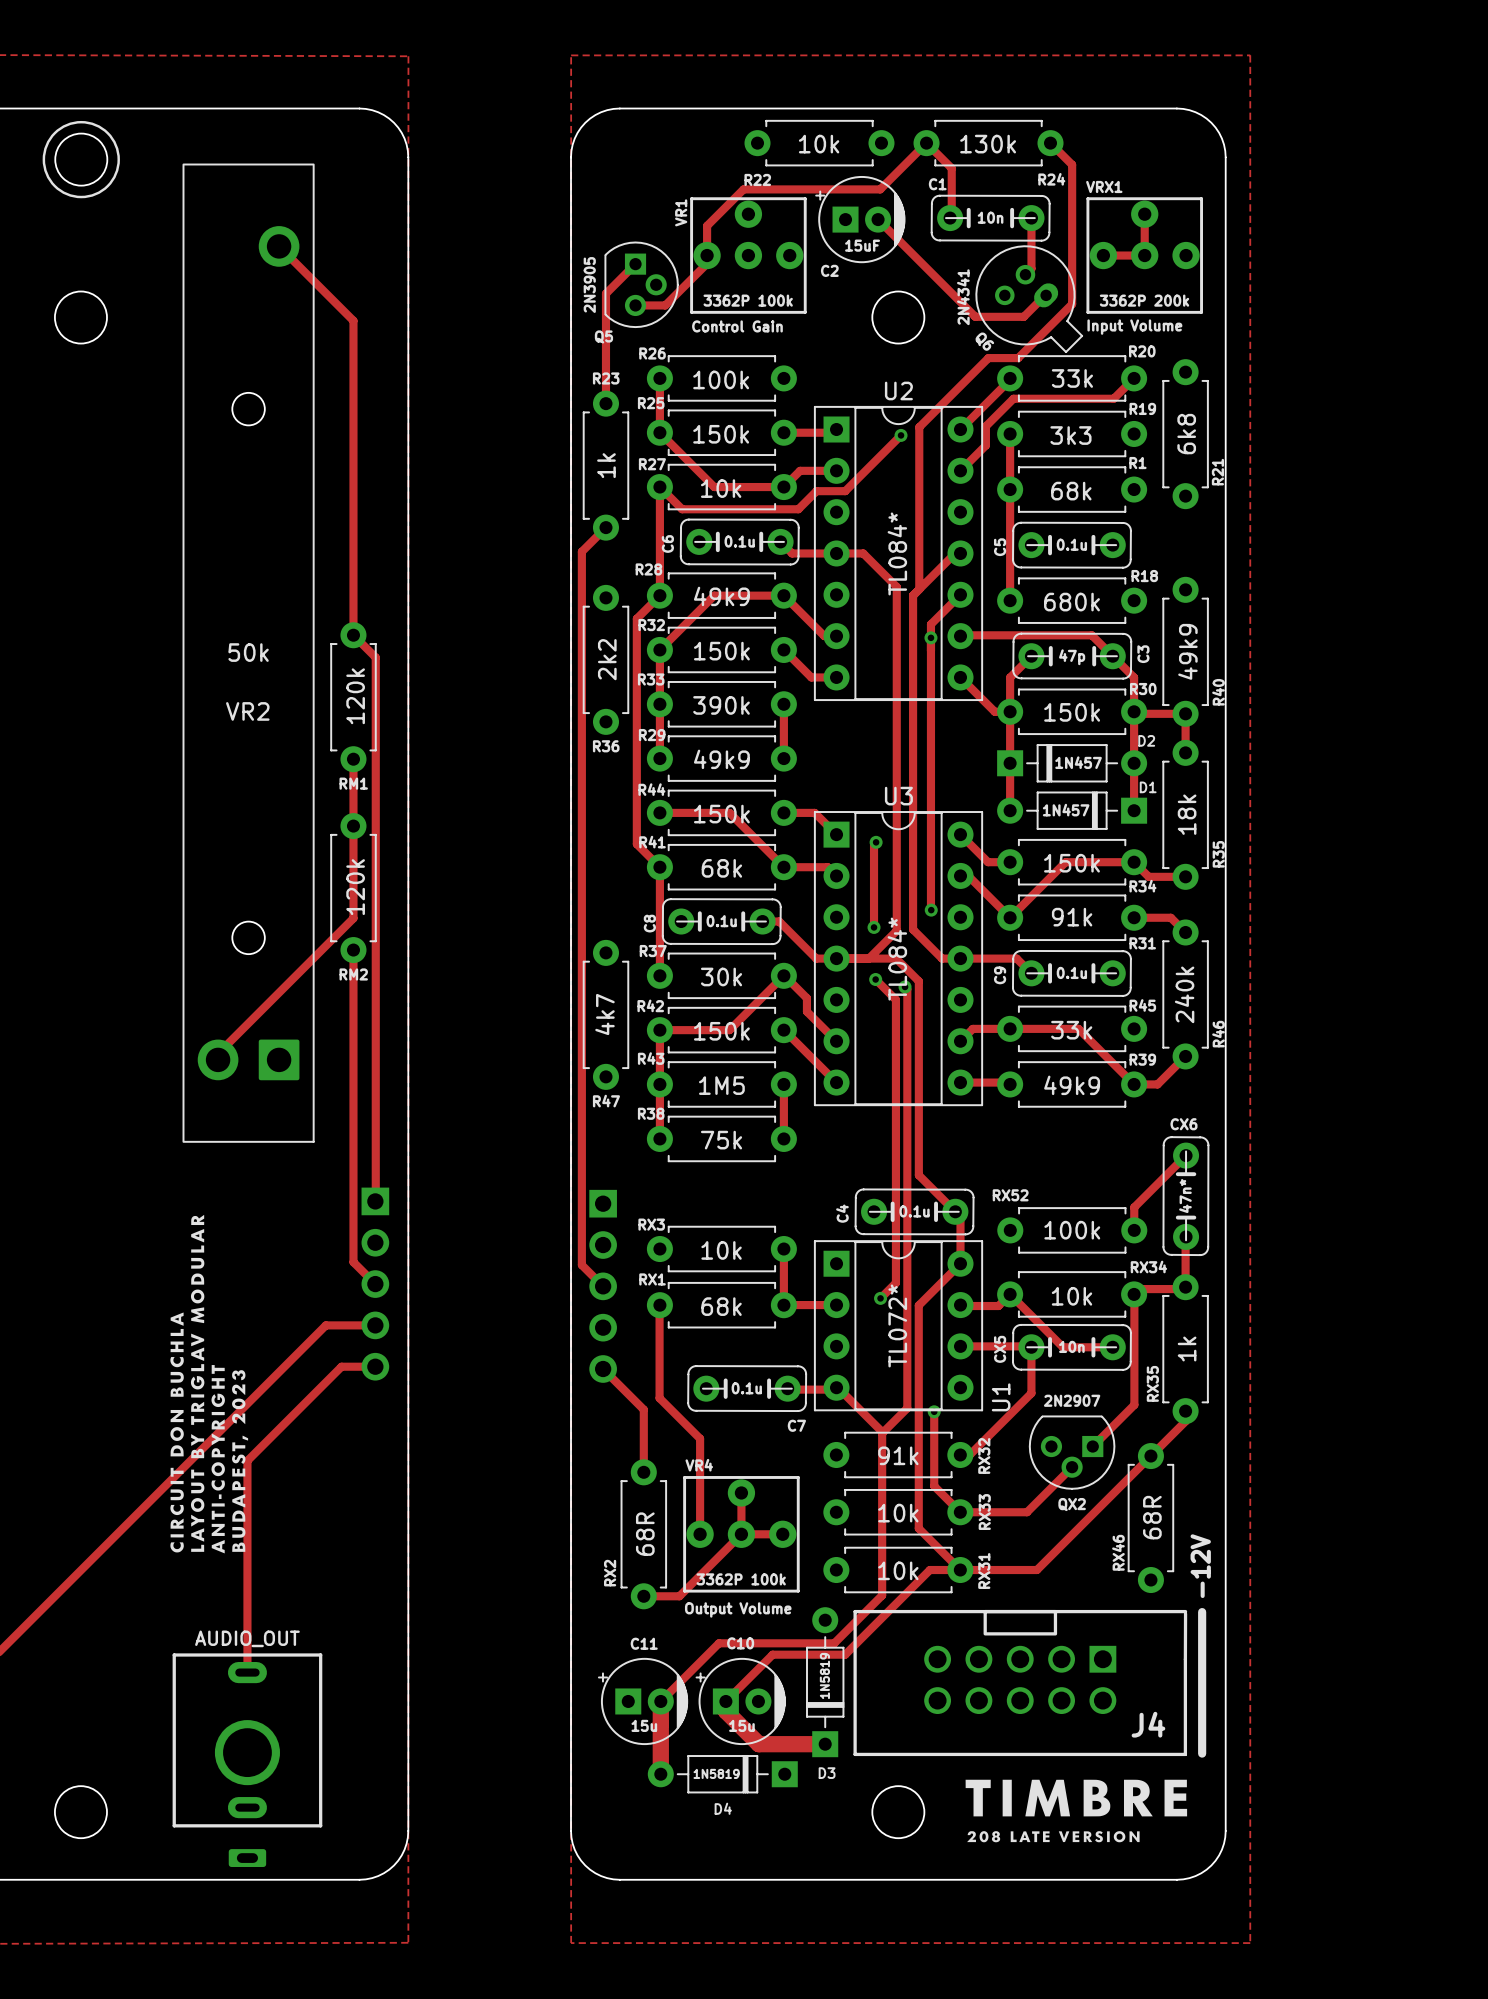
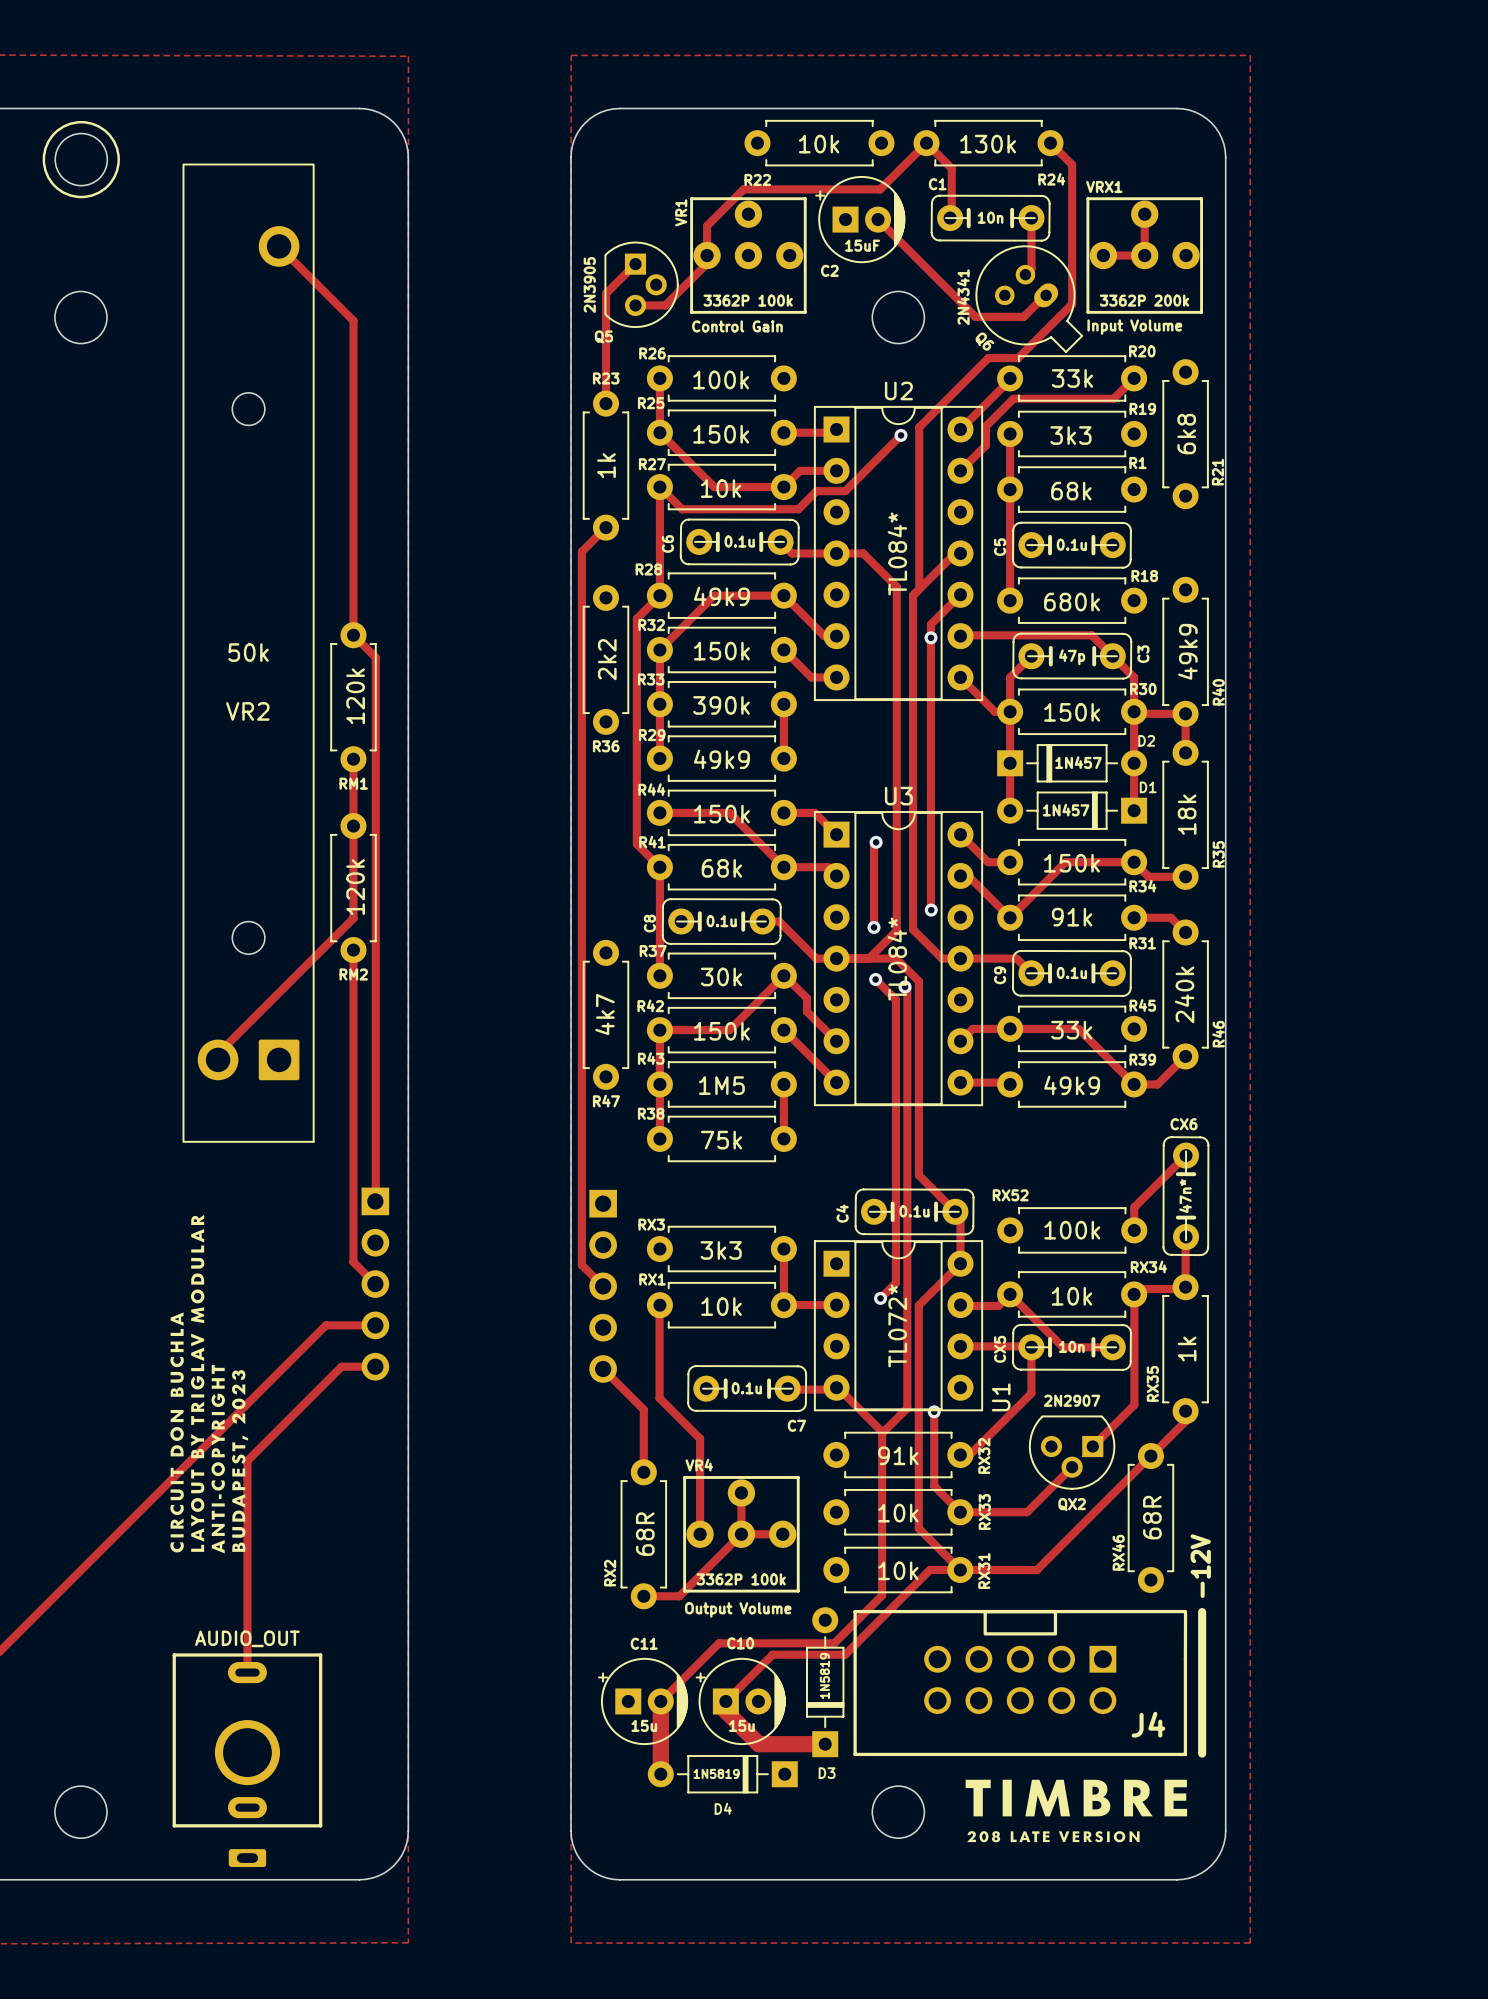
RX3 value: 10k (721, 1250) -> 3k3 (721, 1250)
RX1 value: 68k (721, 1306) -> 10k (721, 1306)

